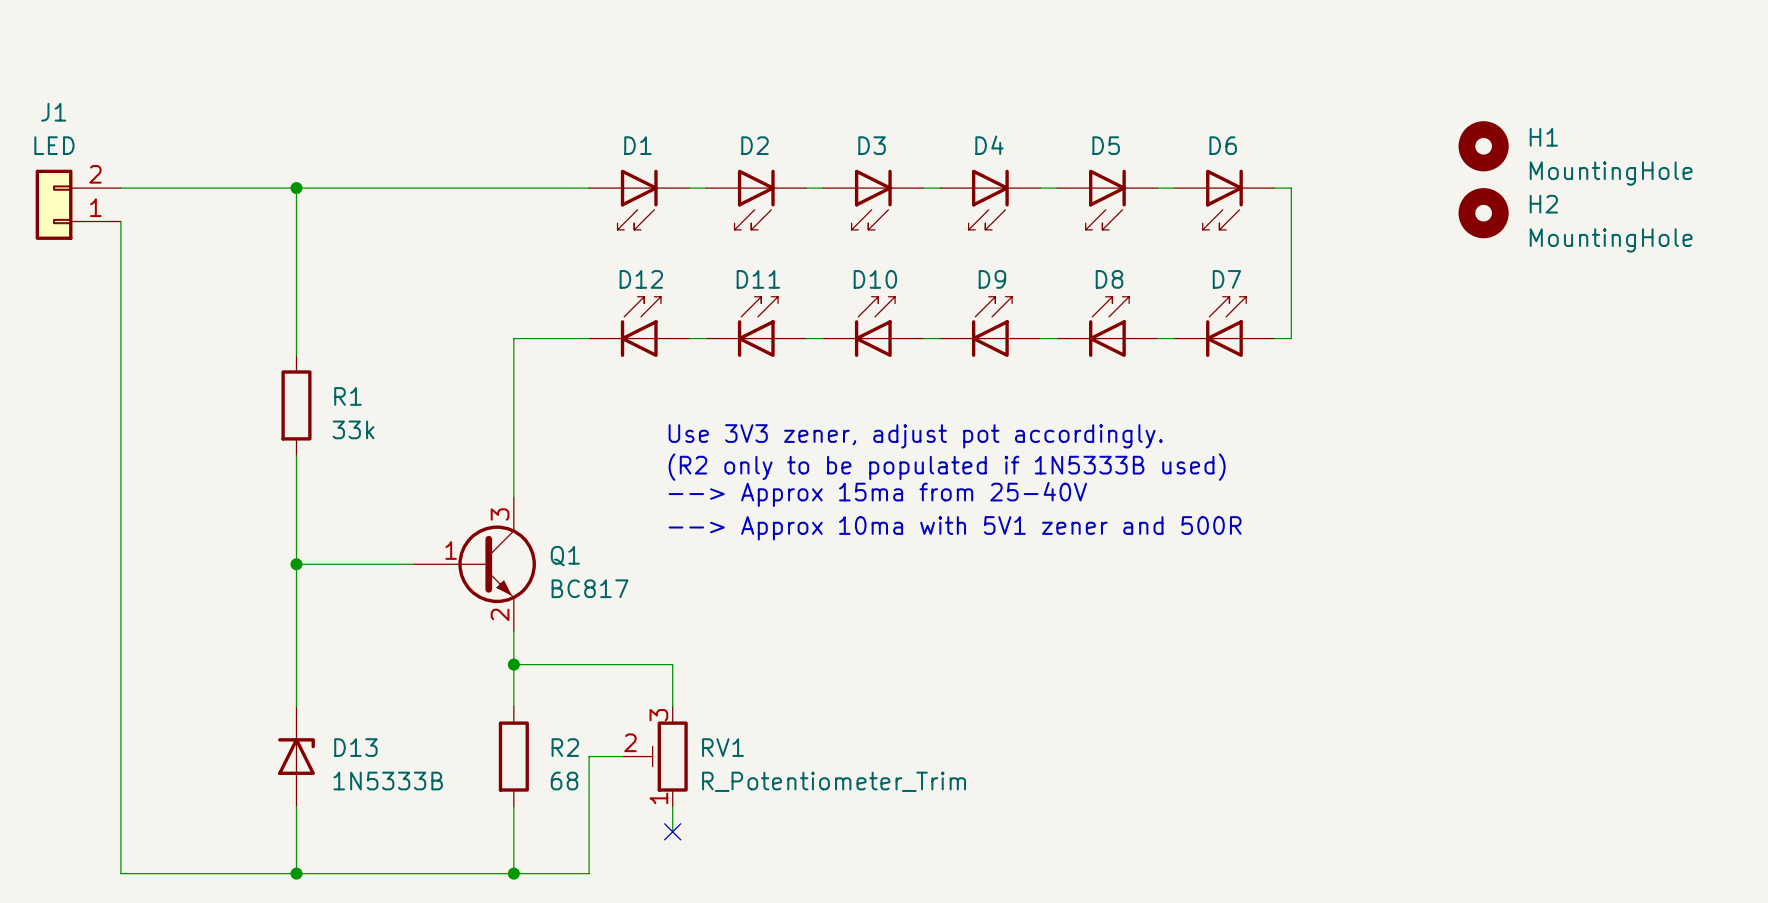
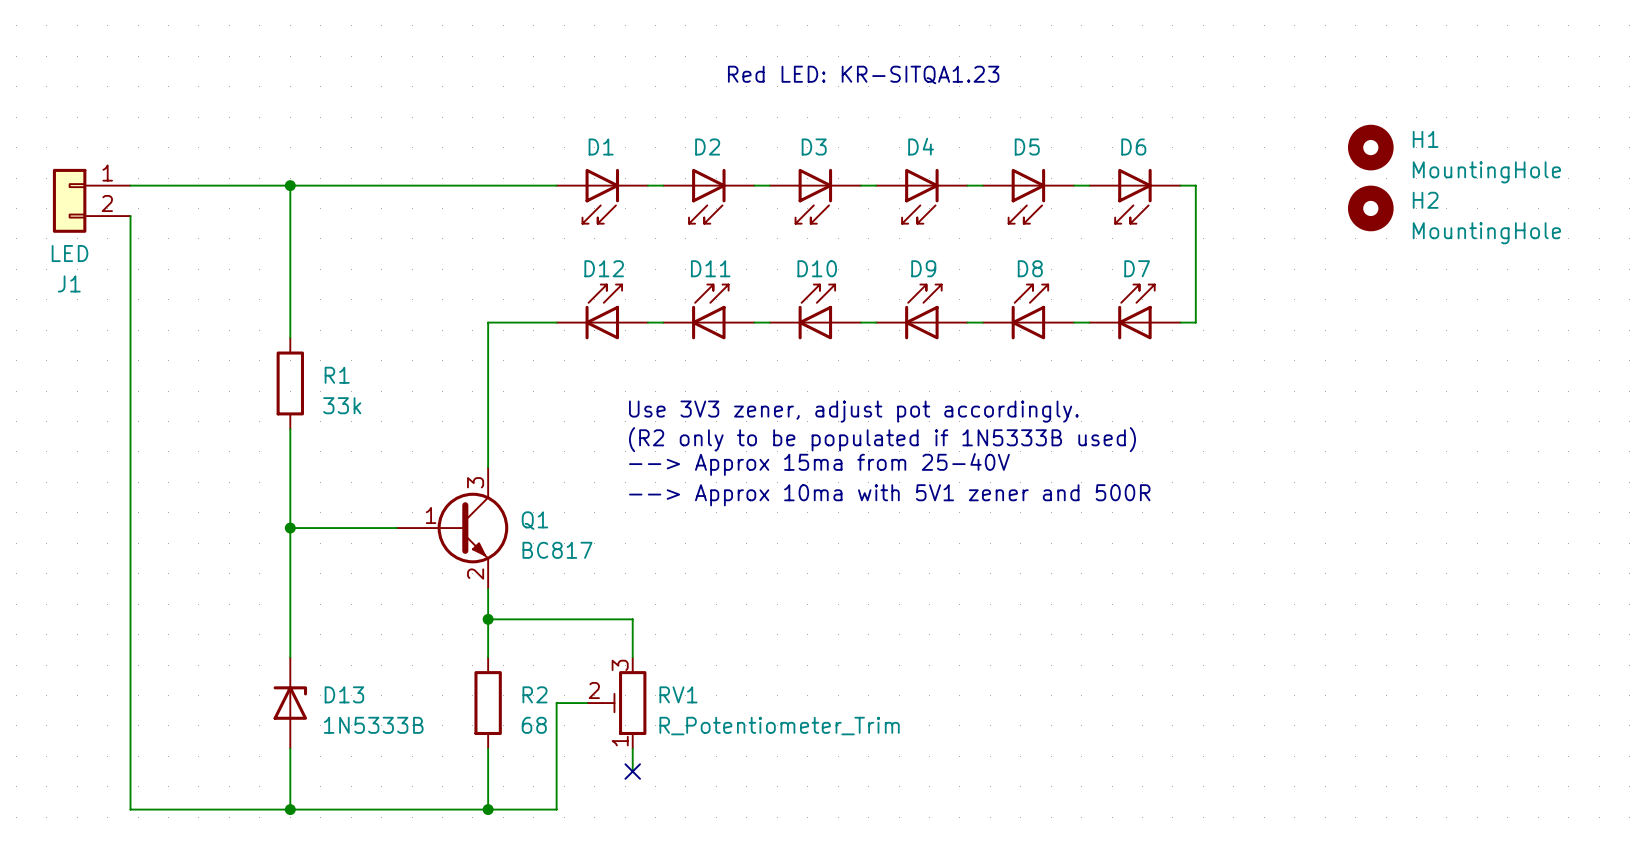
text: none -> Red LED: KR-SITQA1.23 (863, 74)
J1 flip: as is (54, 204) -> up-down (69, 200)

